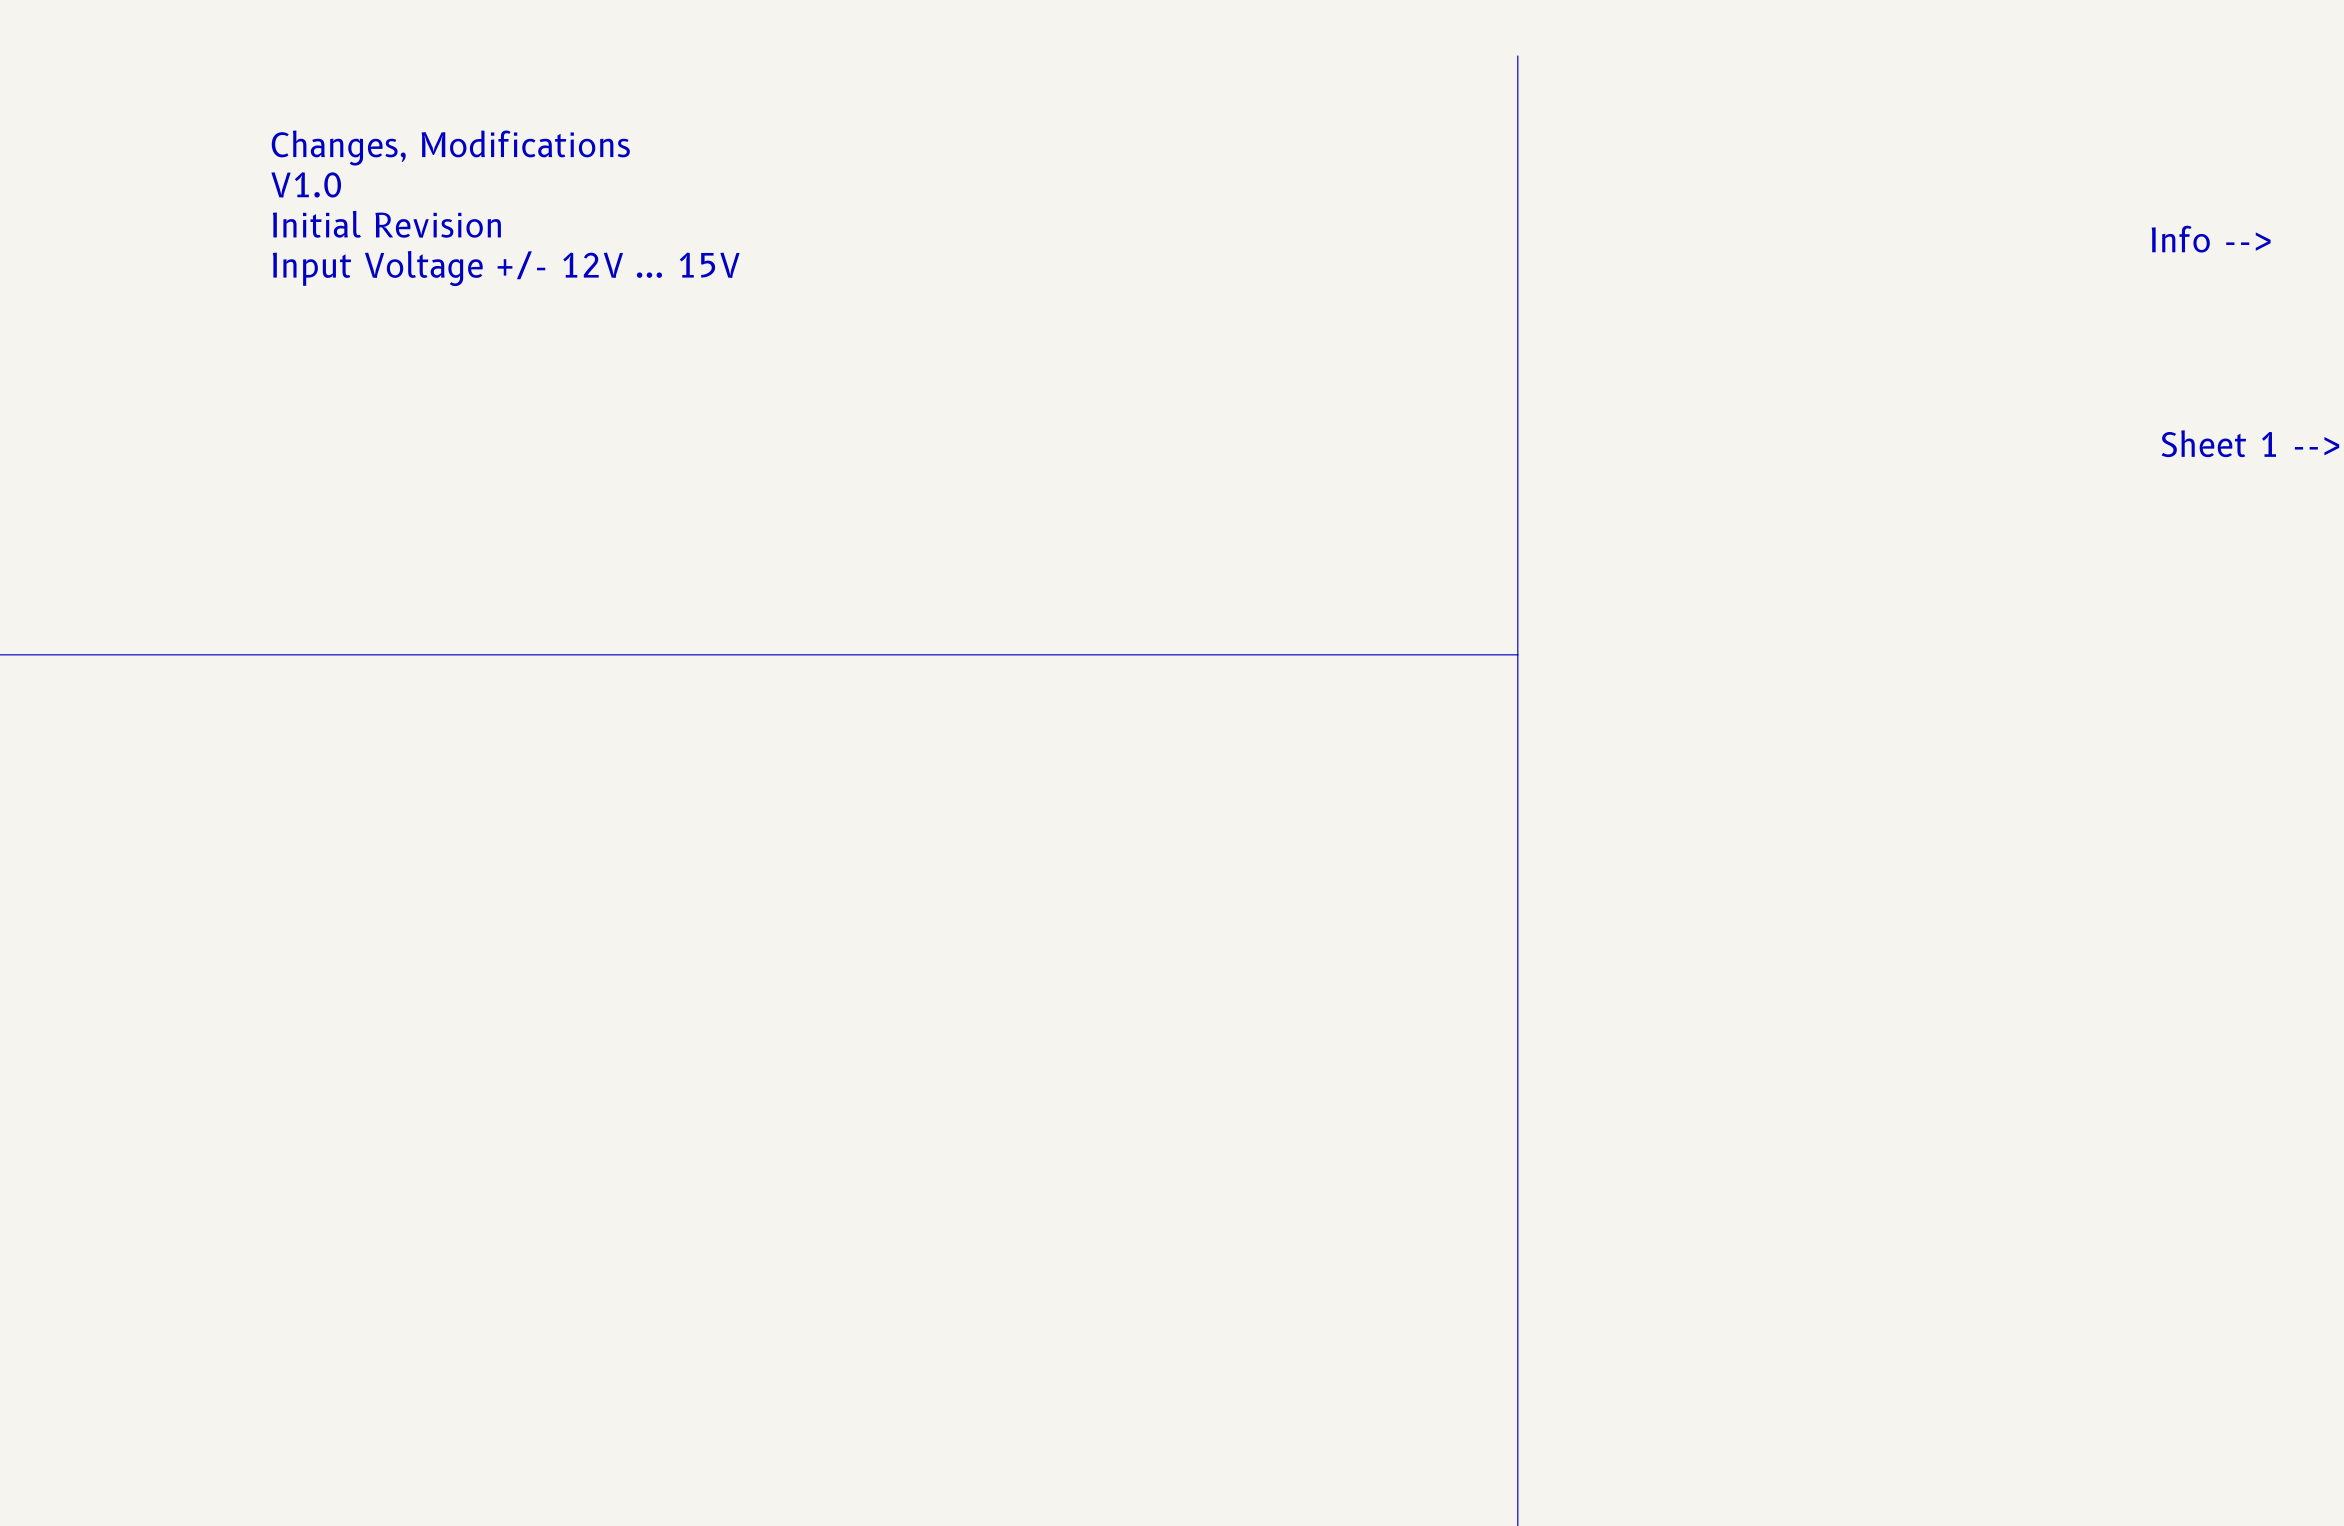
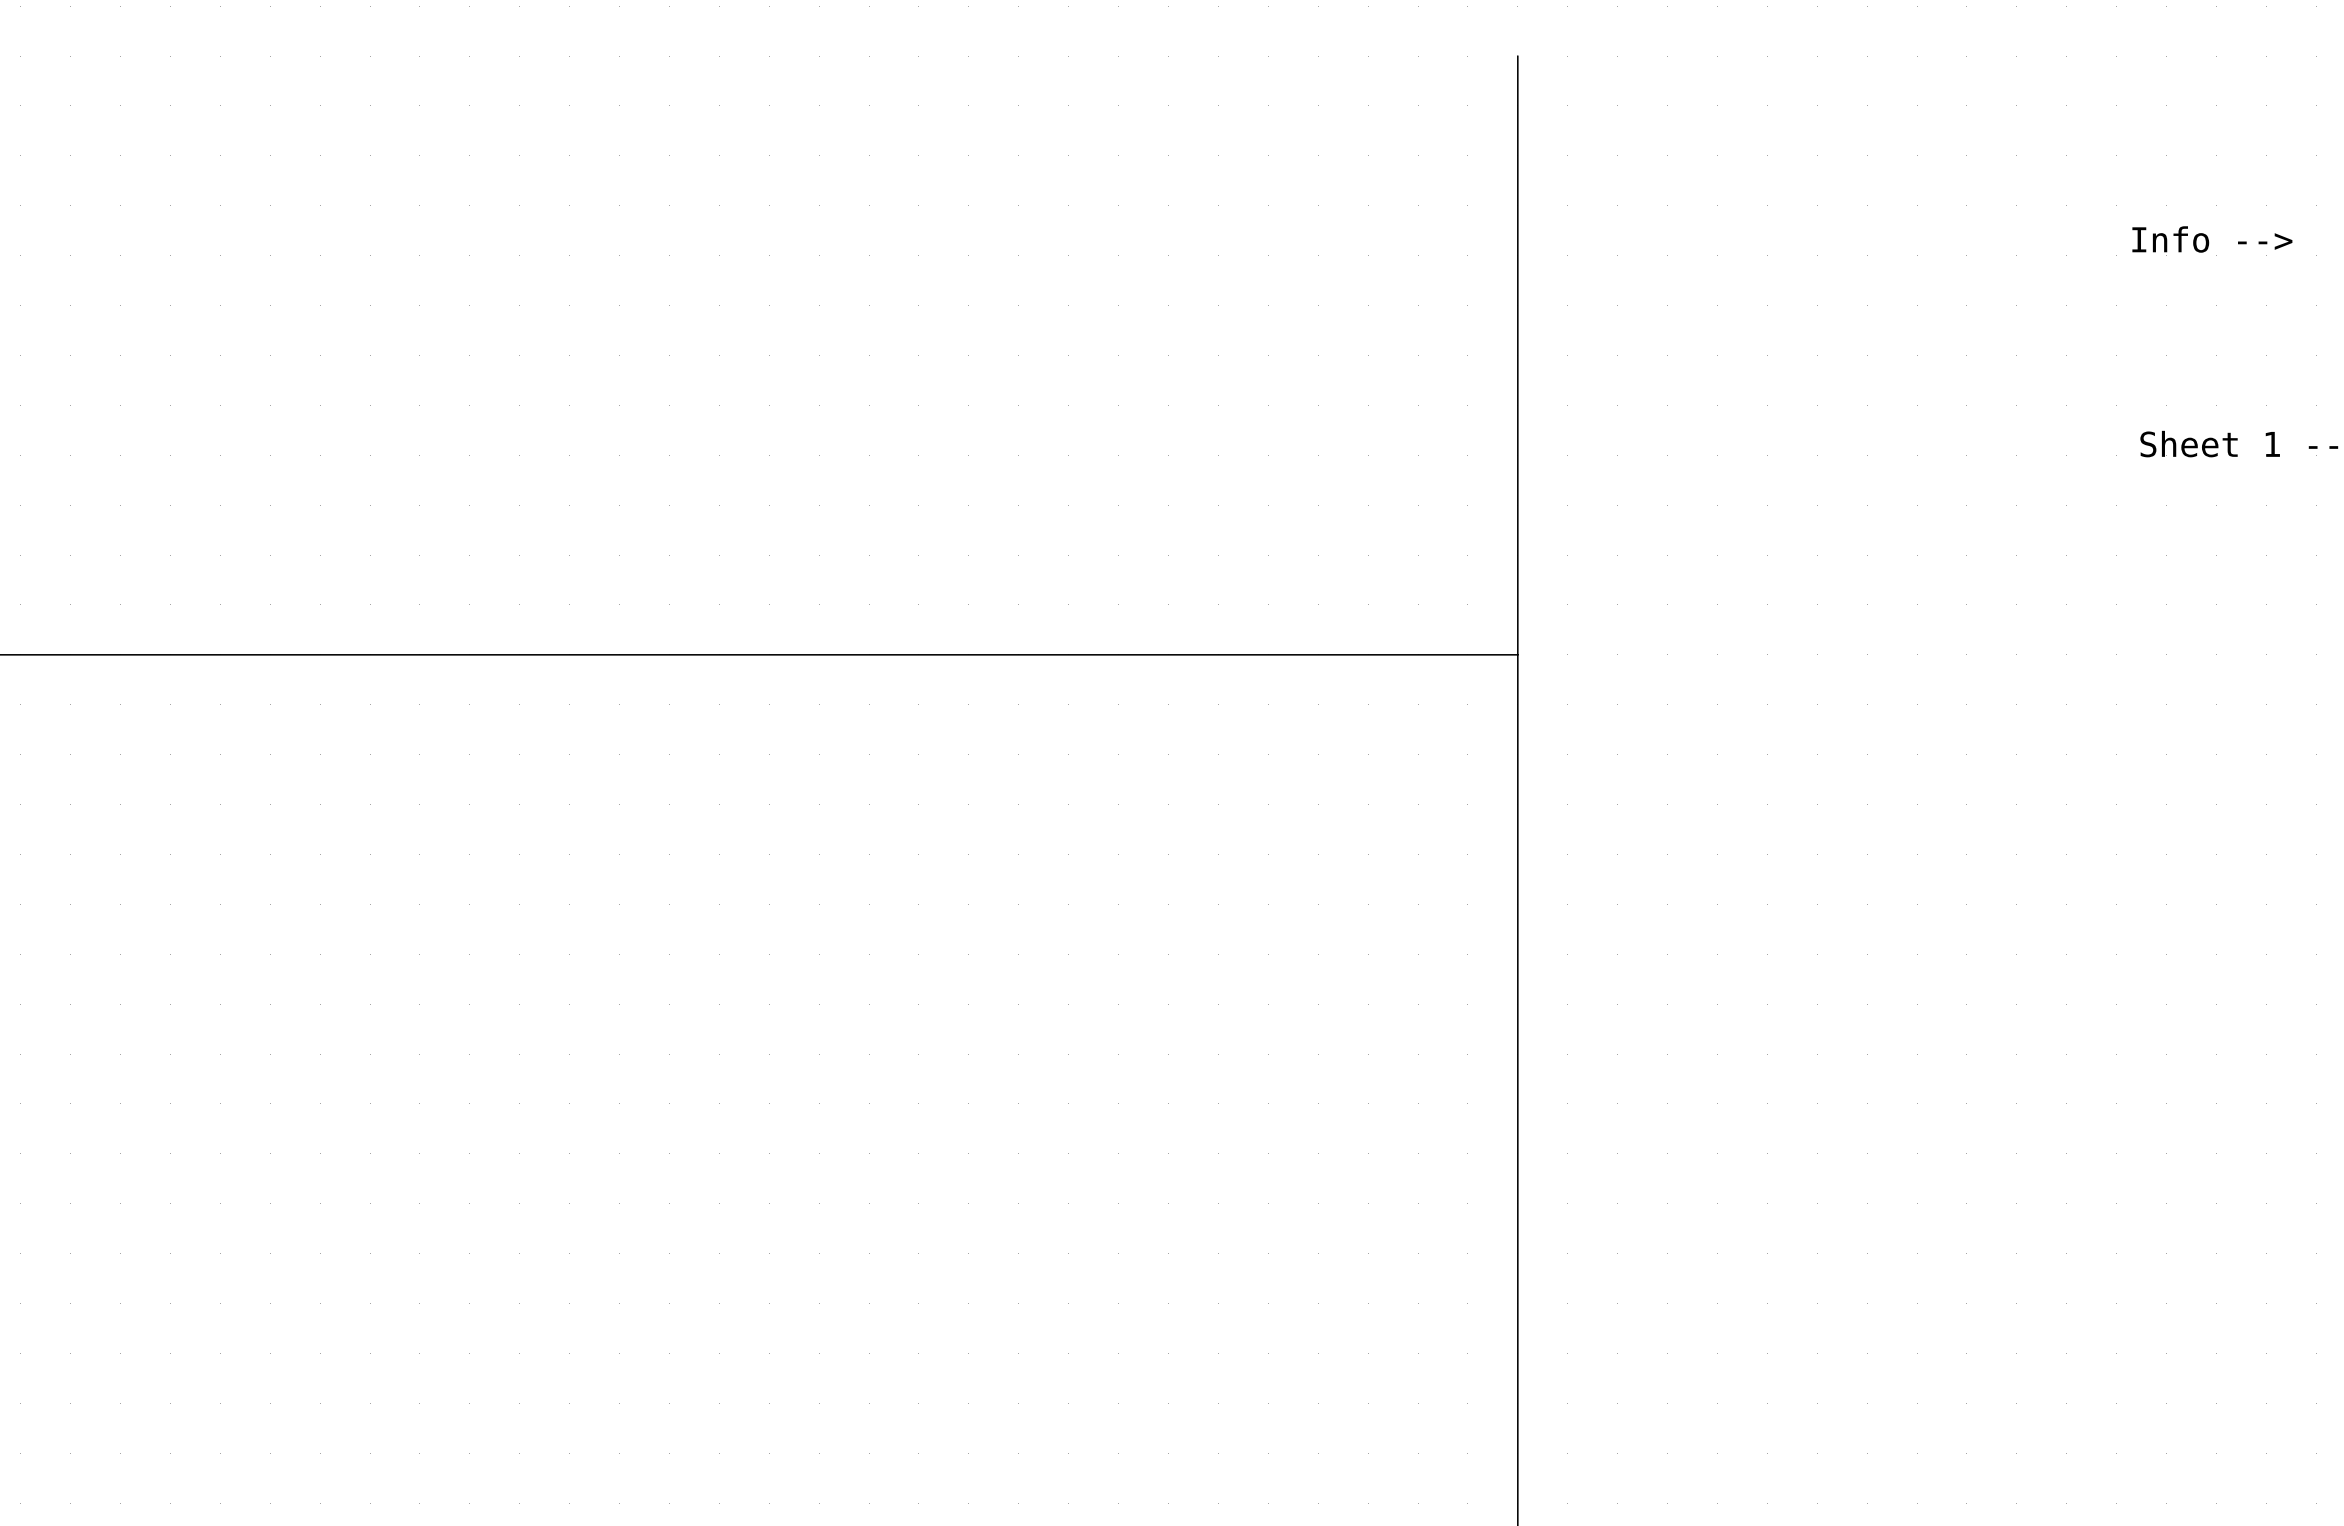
text: Changes, Modifications (450, 148) -> none
text: V1.0 (306, 184) -> none
text: Initial Revision (386, 224) -> none
text: Input Voltage +/- 12V ... 15V (506, 268) -> none

